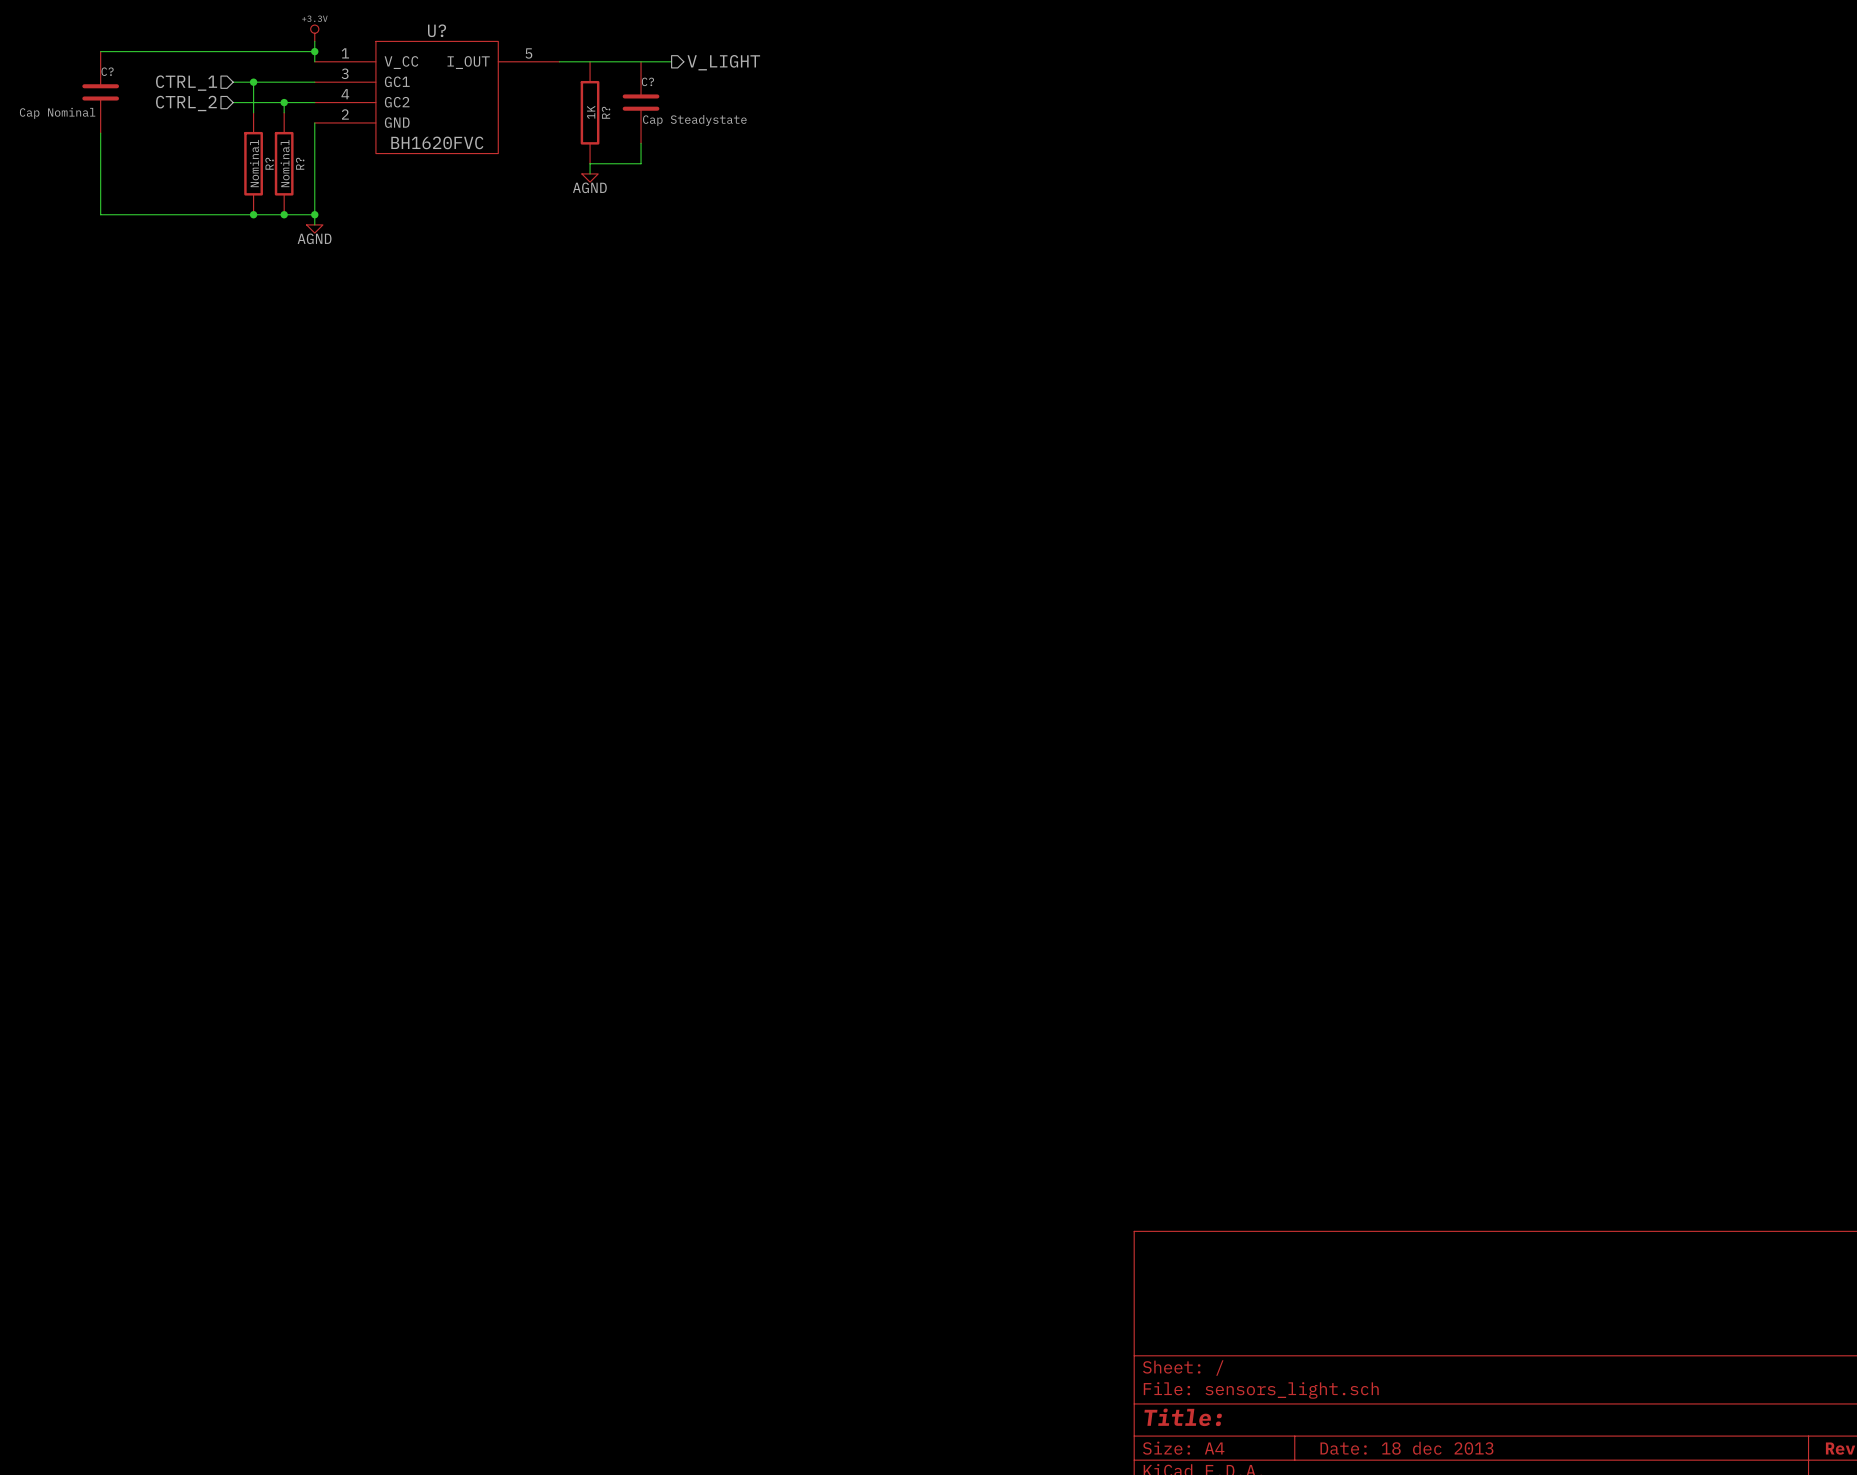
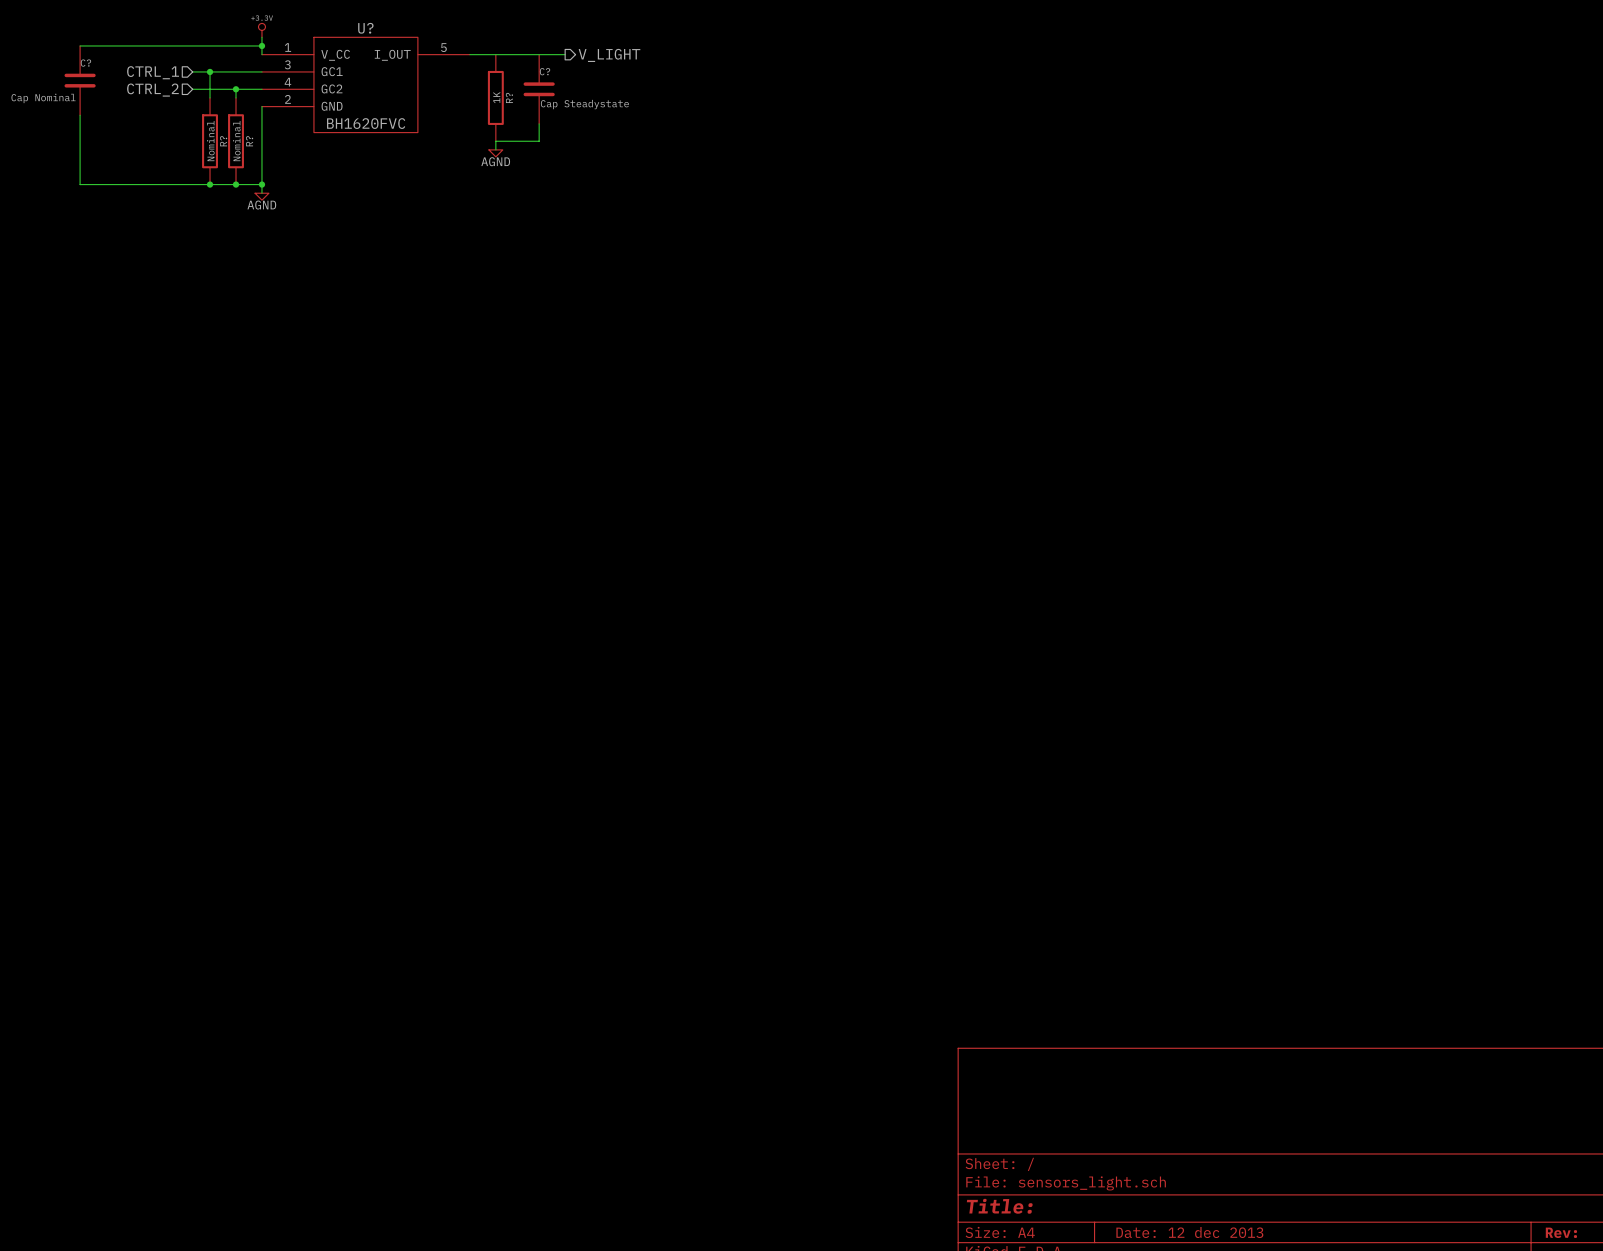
title block: Date: 18 dec 2013 (1406, 1448) -> Date: 12 dec 2013 (1189, 1232)

